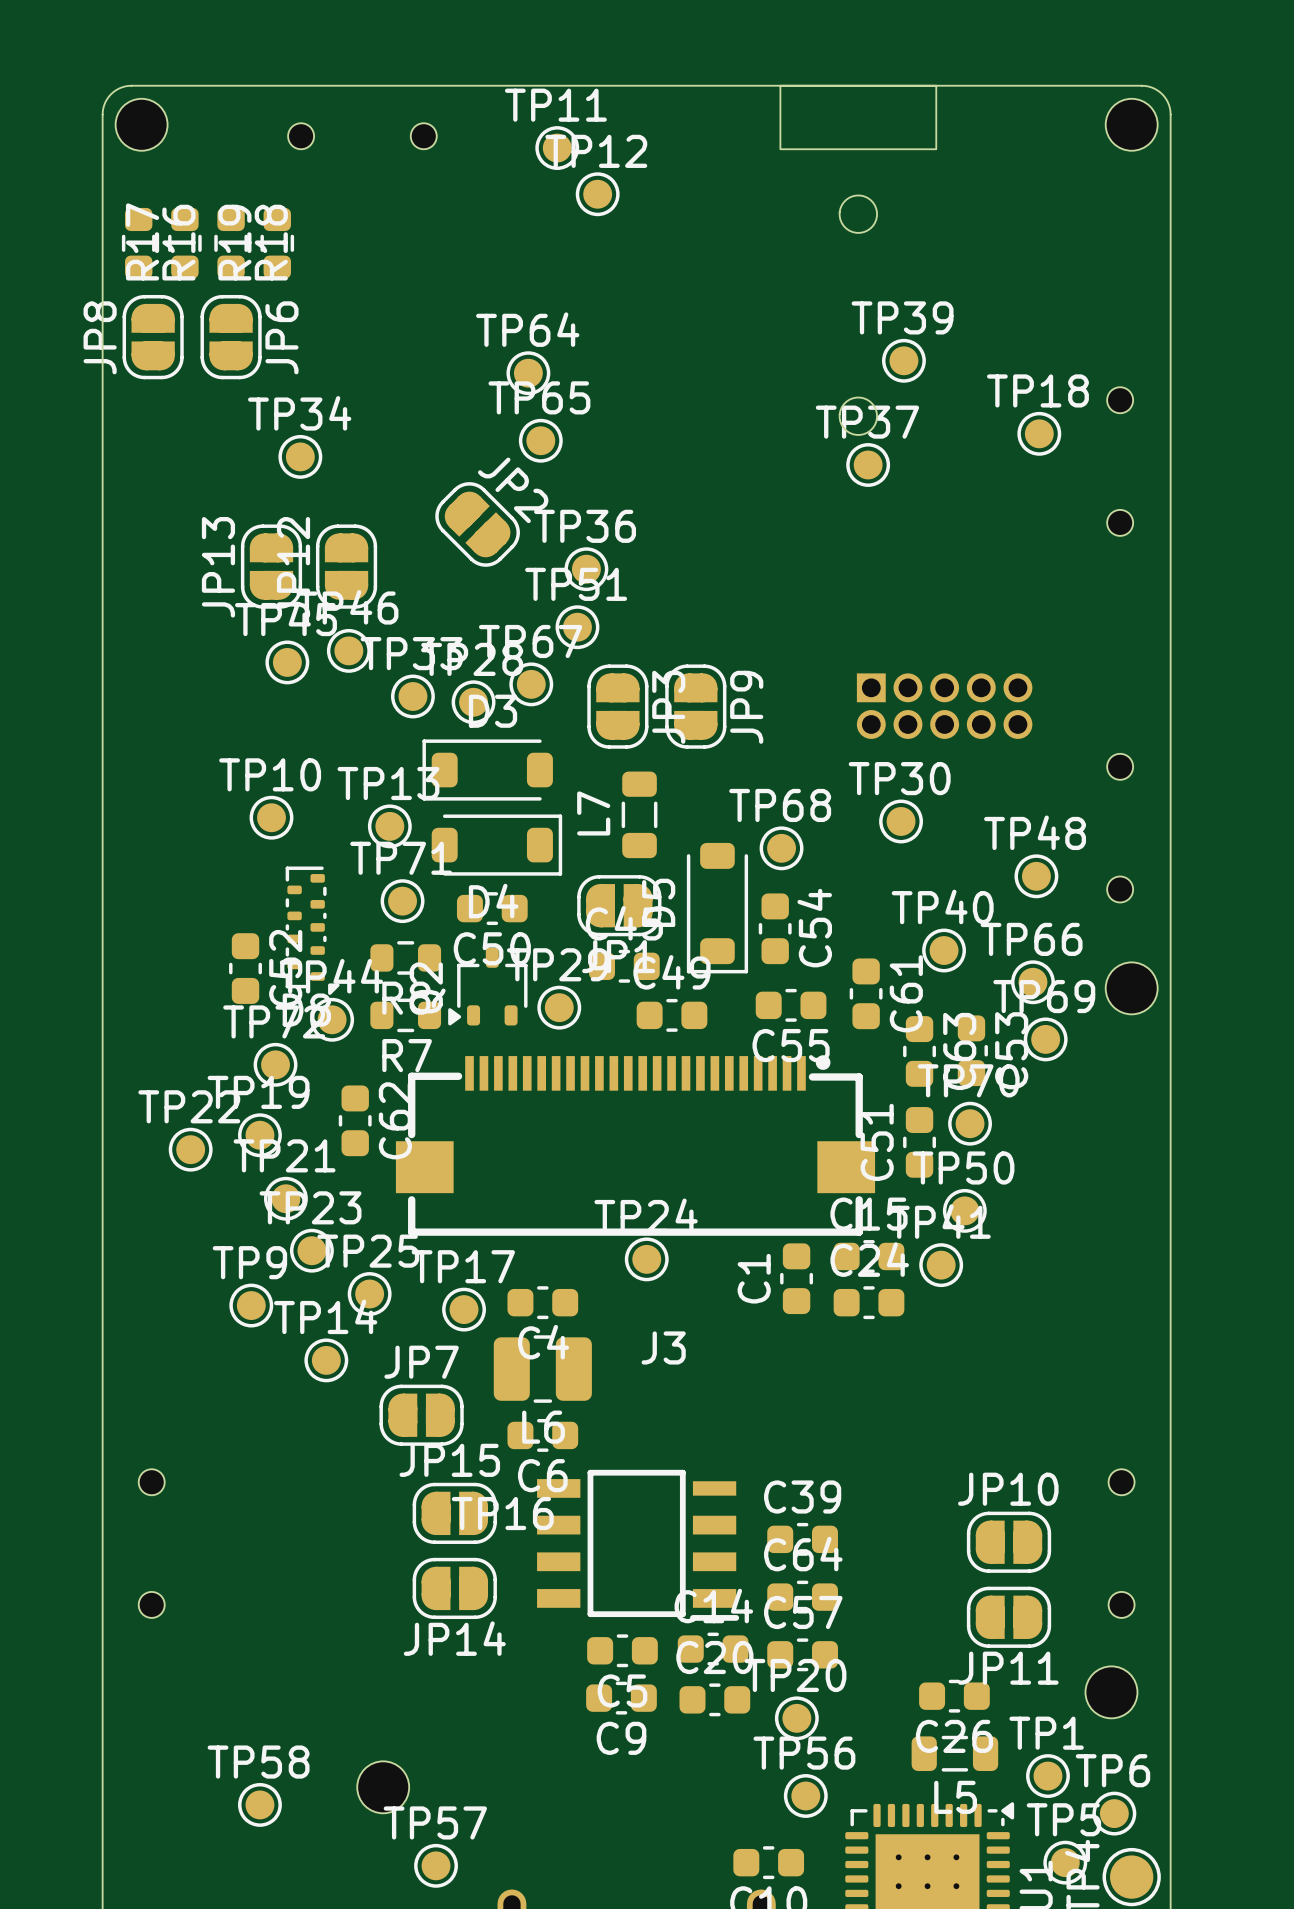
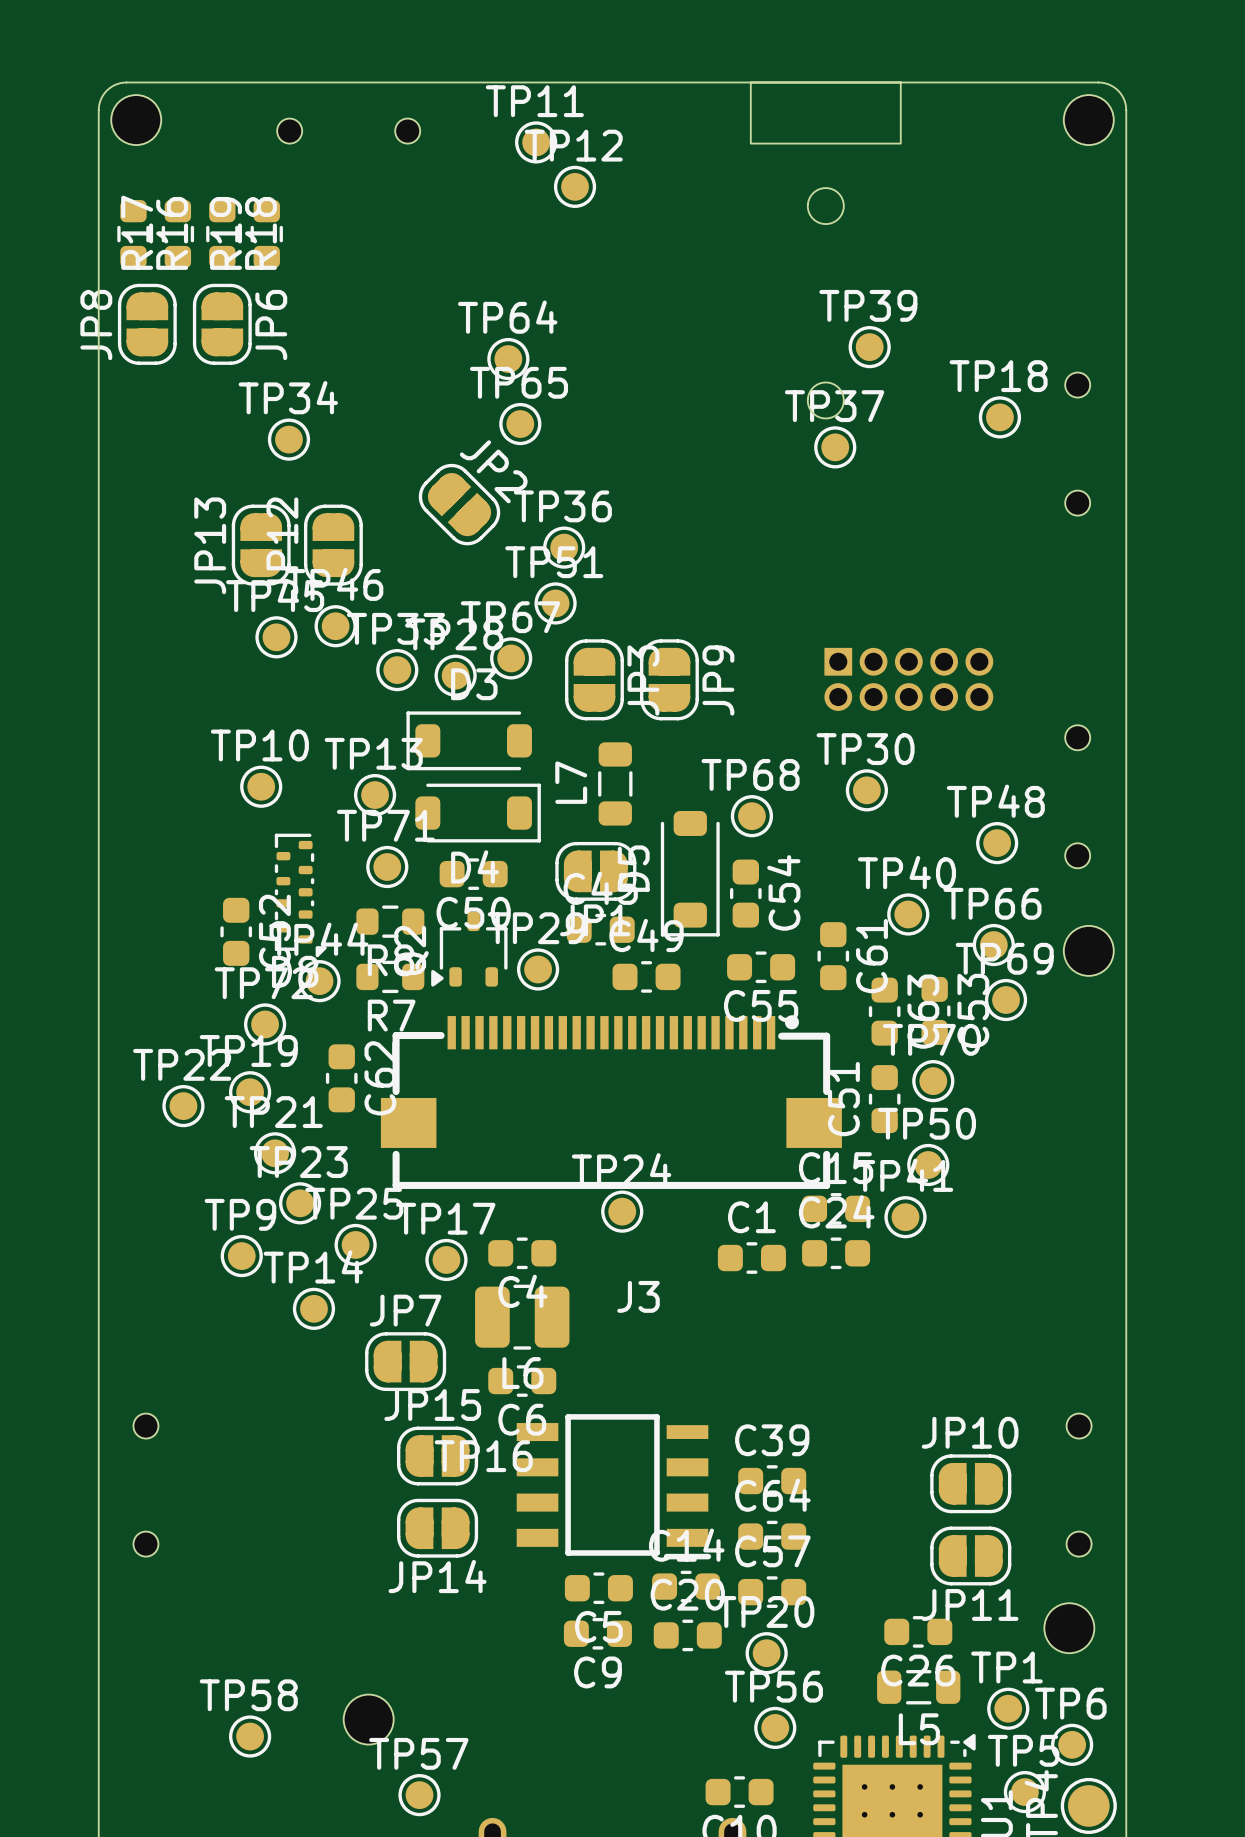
C1 rotation: 0° (796, 1278) -> 90° clockwise (751, 1258)

